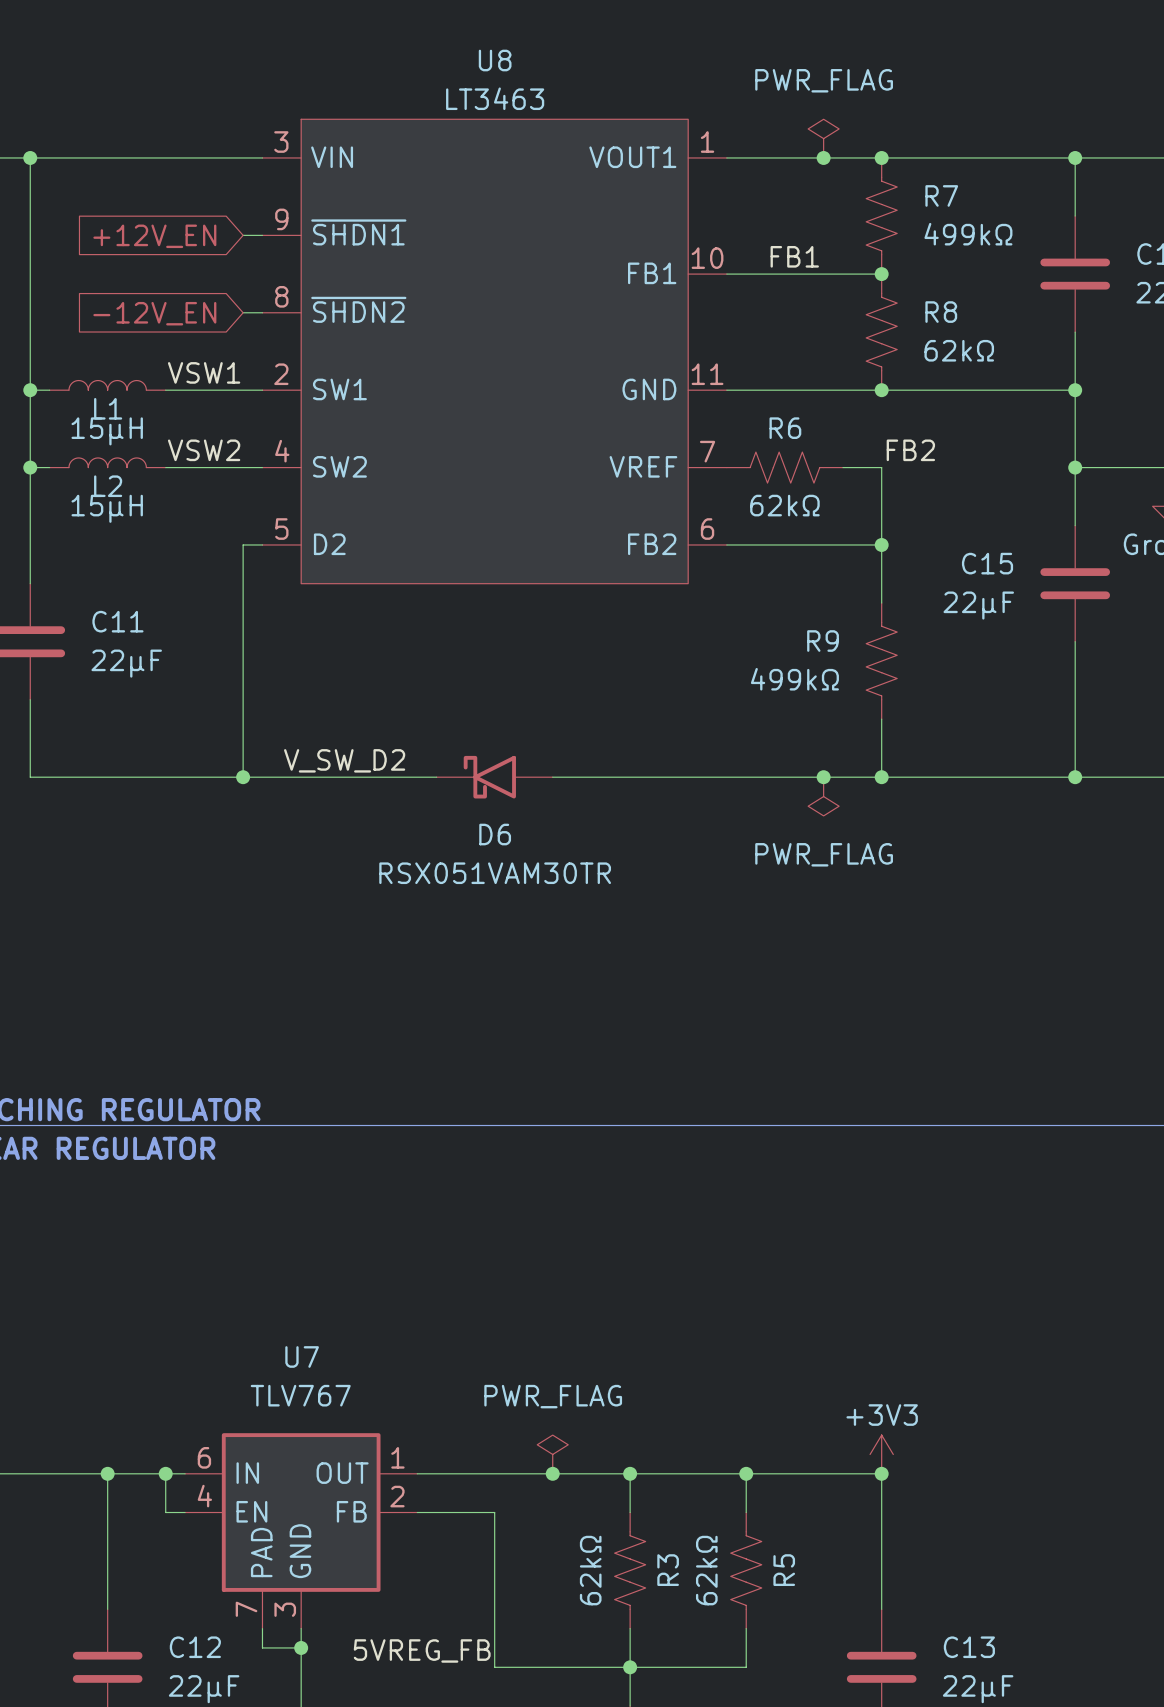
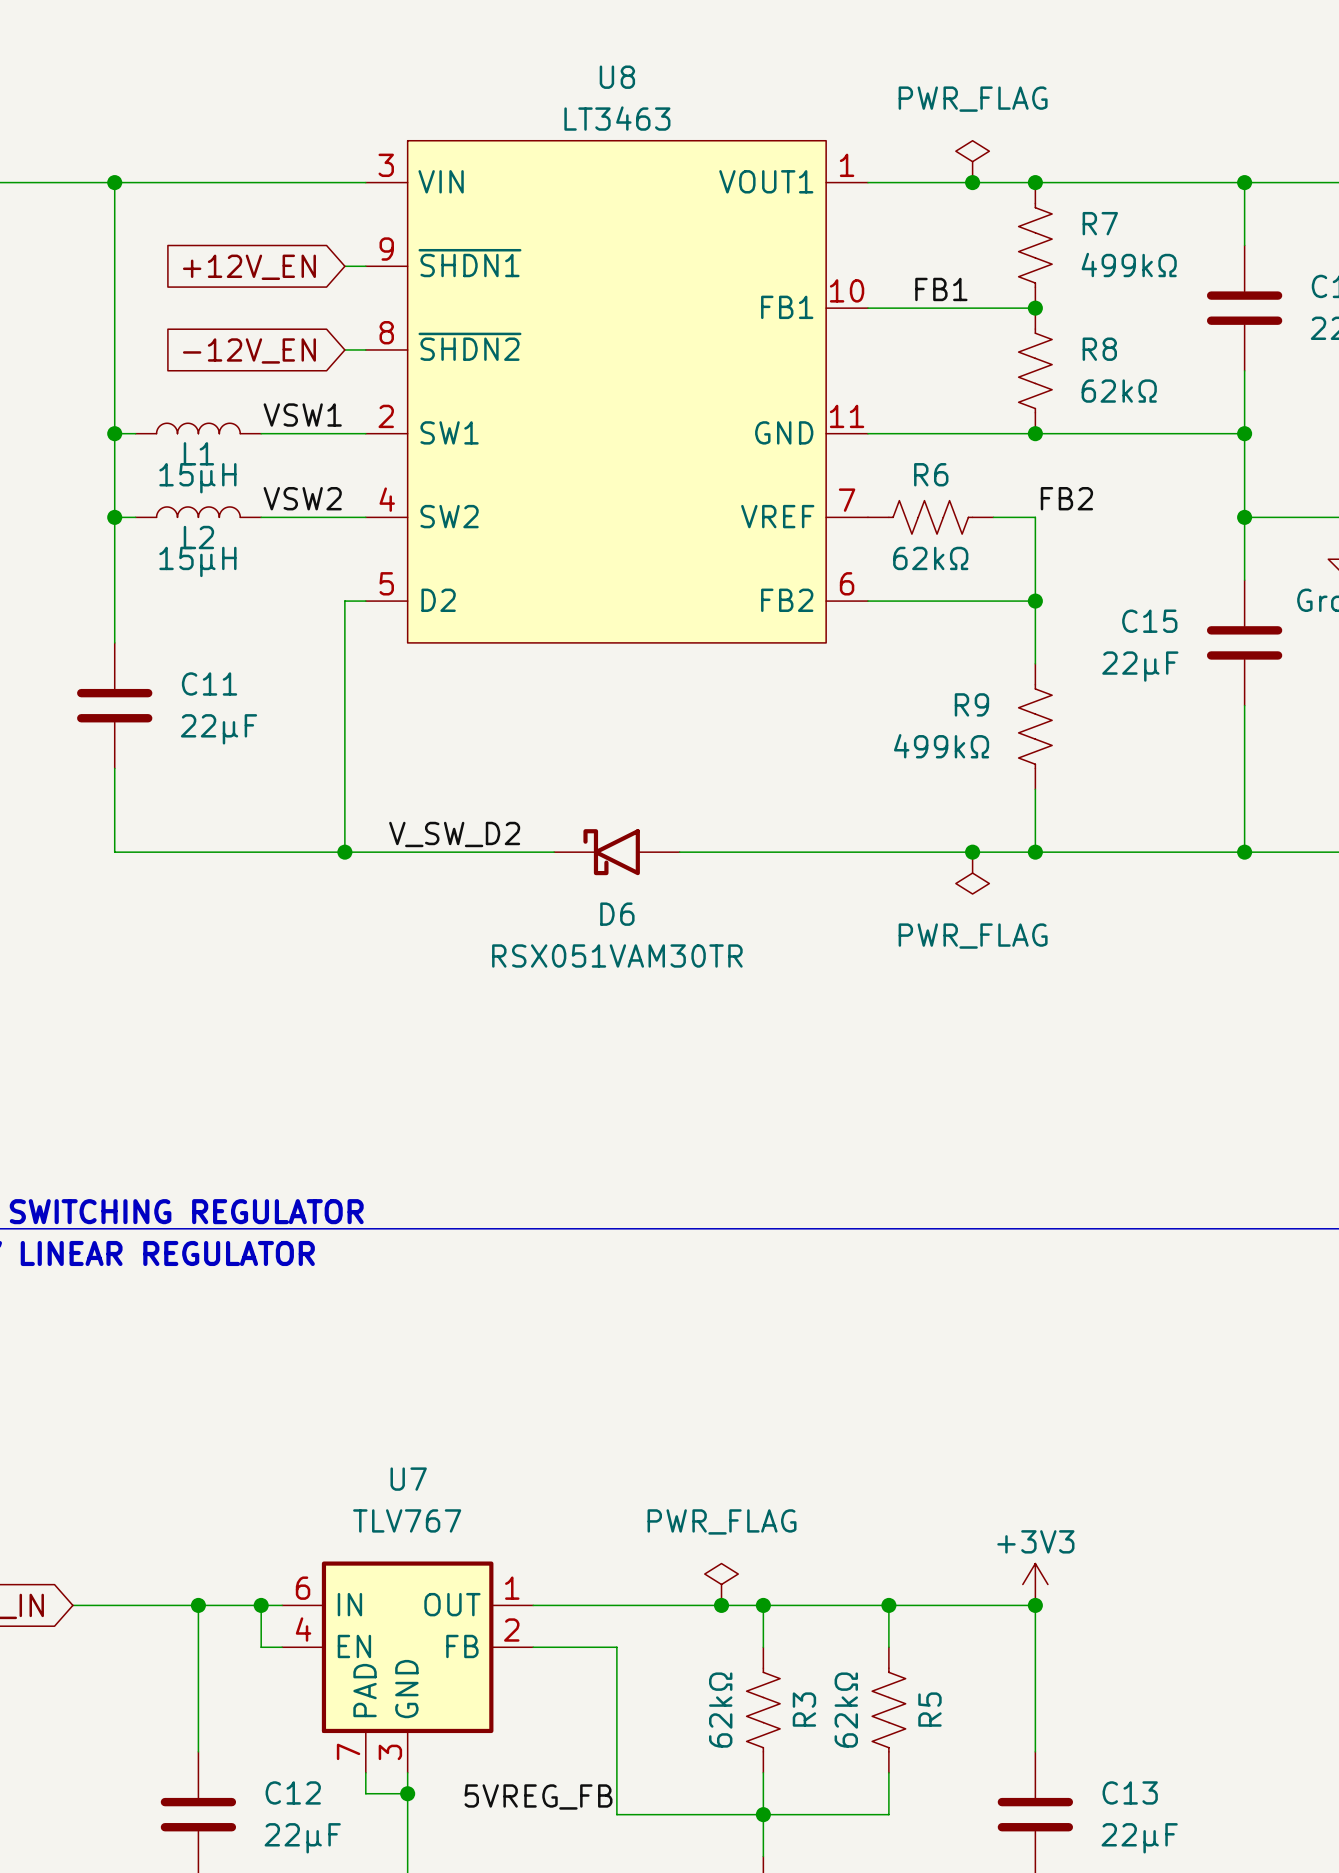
power symbol position: PWR_FLAG (552, 1454) -> PWR_FLAG (721, 1584)
junction position: (552, 1473) -> (721, 1605)

